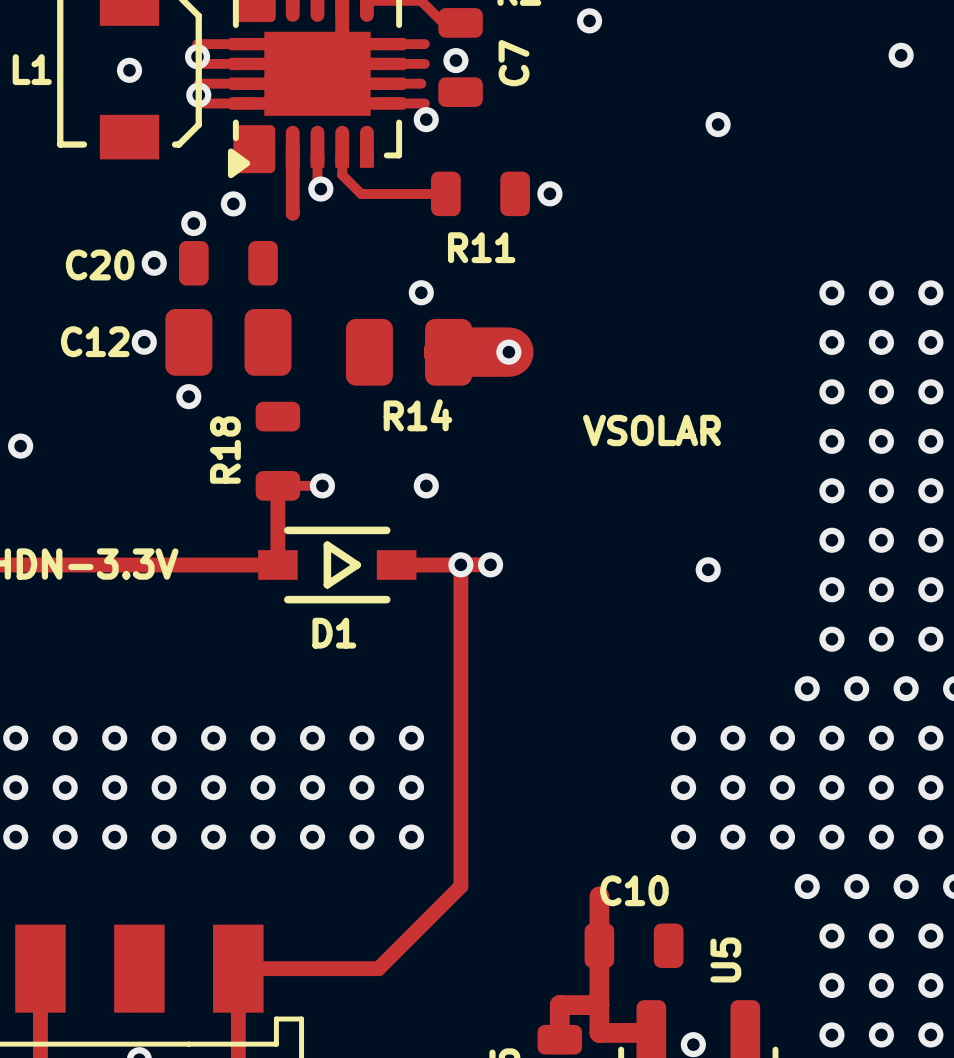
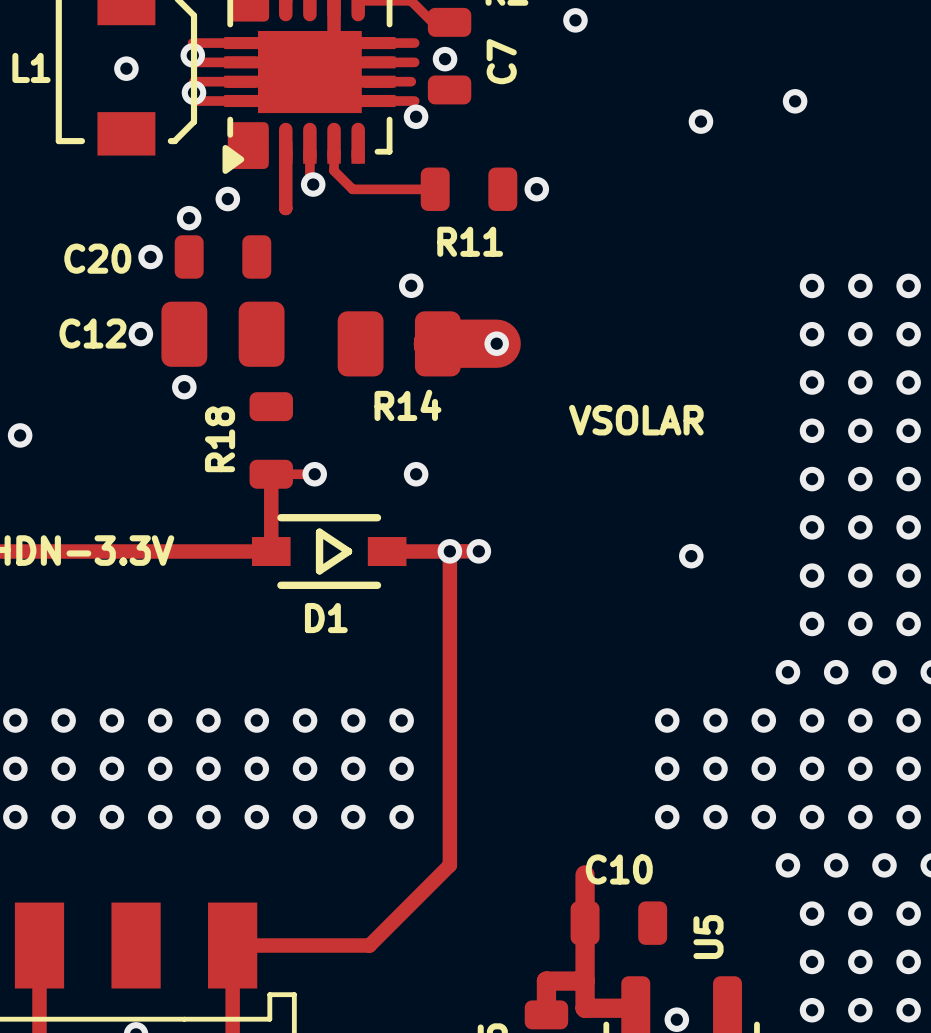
via: (901, 55) -> none
via: none -> (795, 101)

